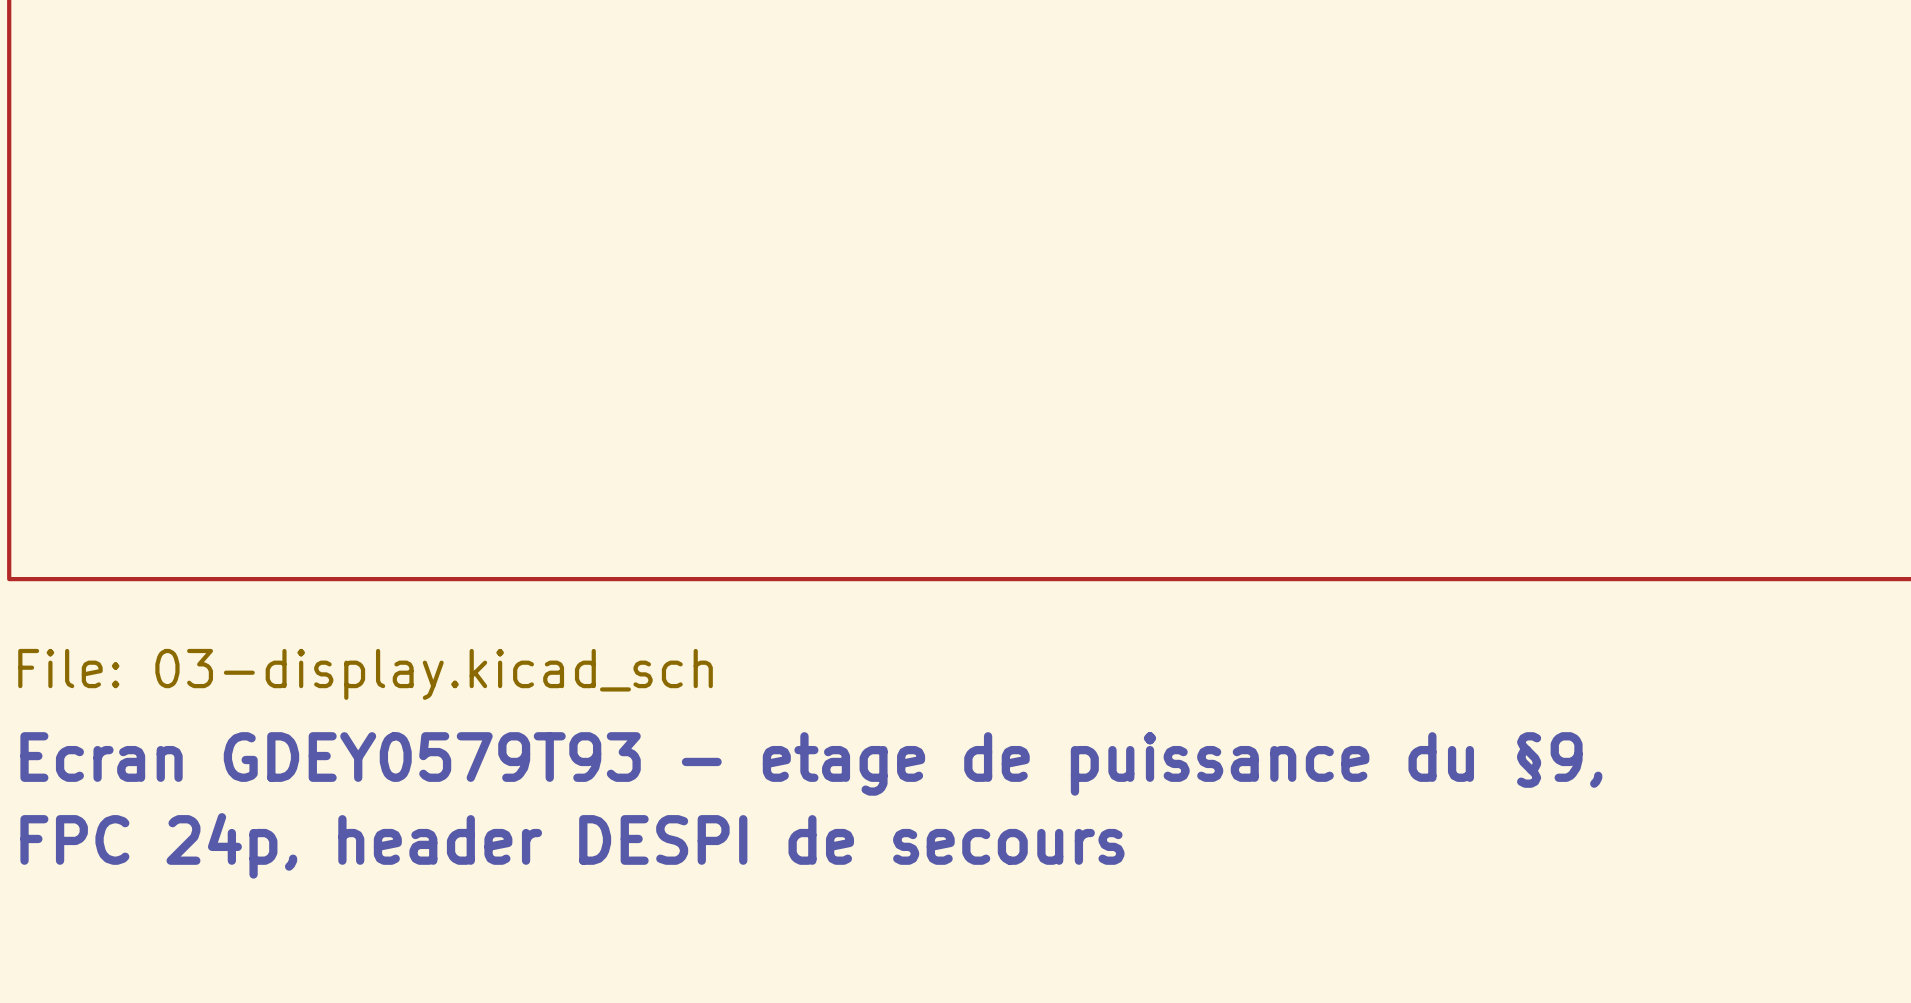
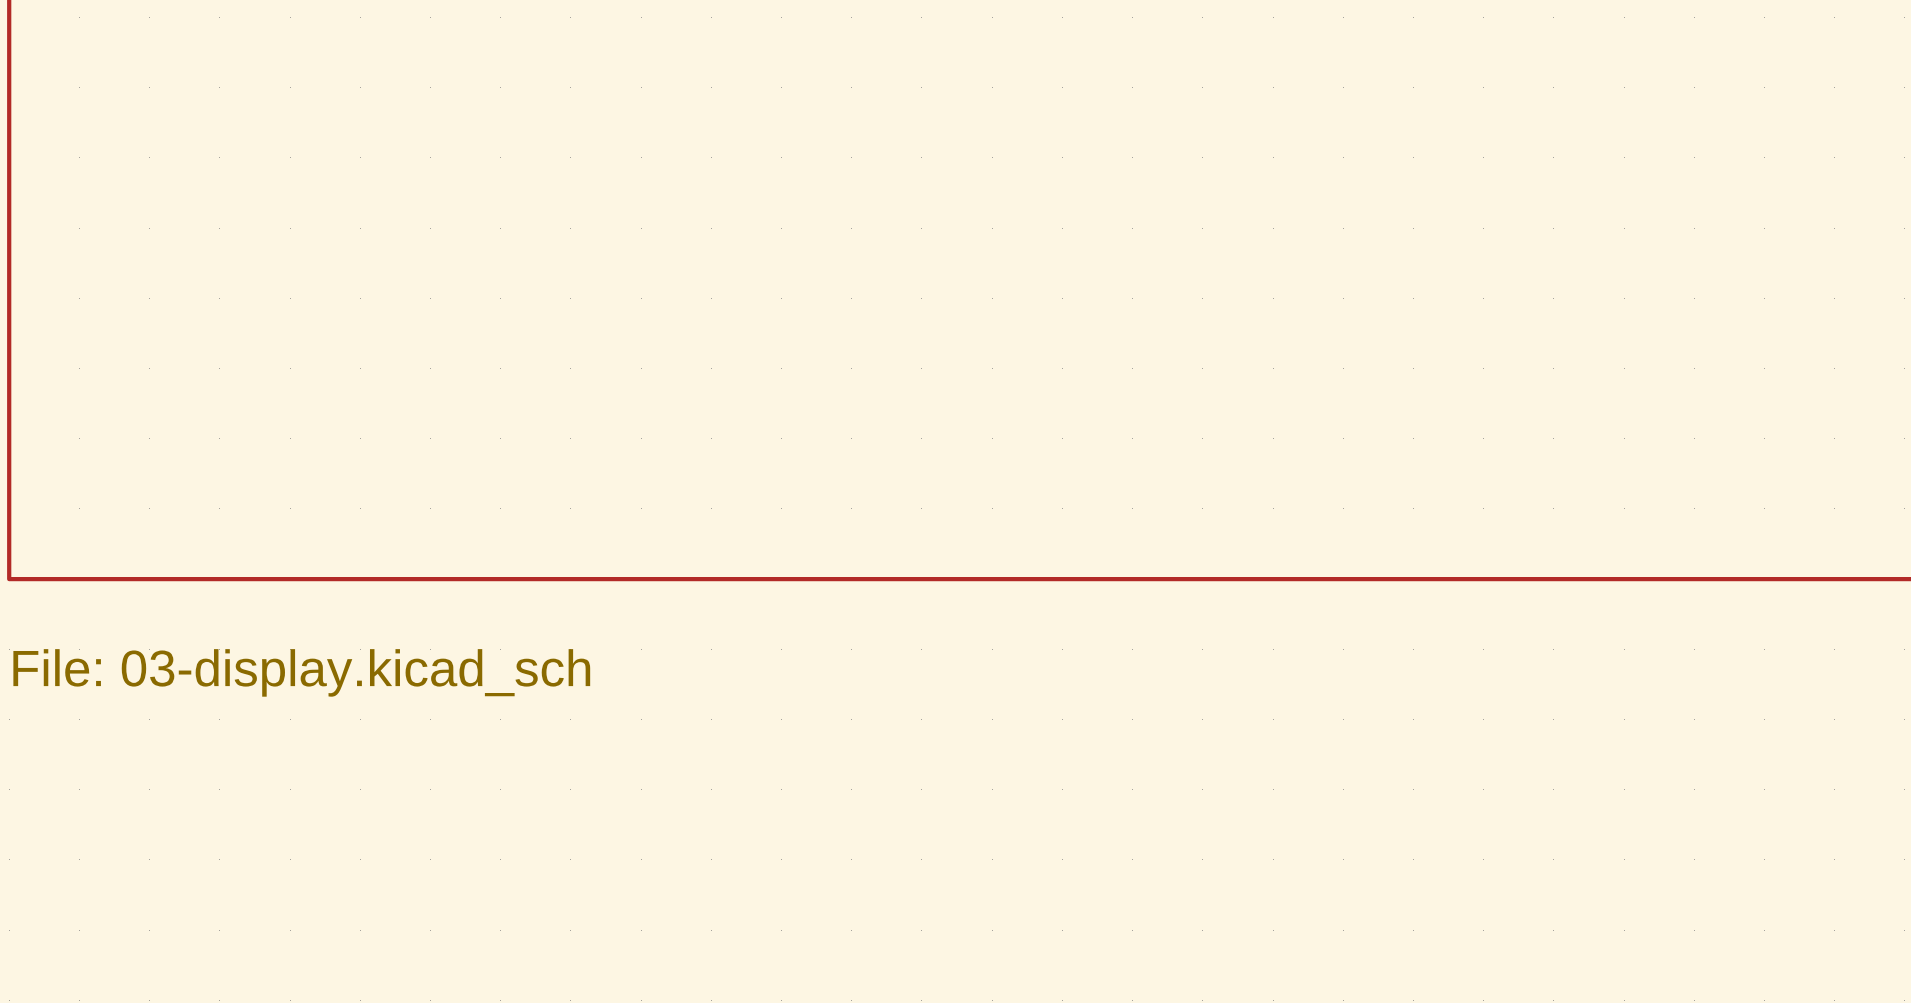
text: Ecran GDEY0579T93 - etage de puissance du §9, (811, 763) -> none
text: FPC 24p, header DESPI de secours (572, 845) -> none

